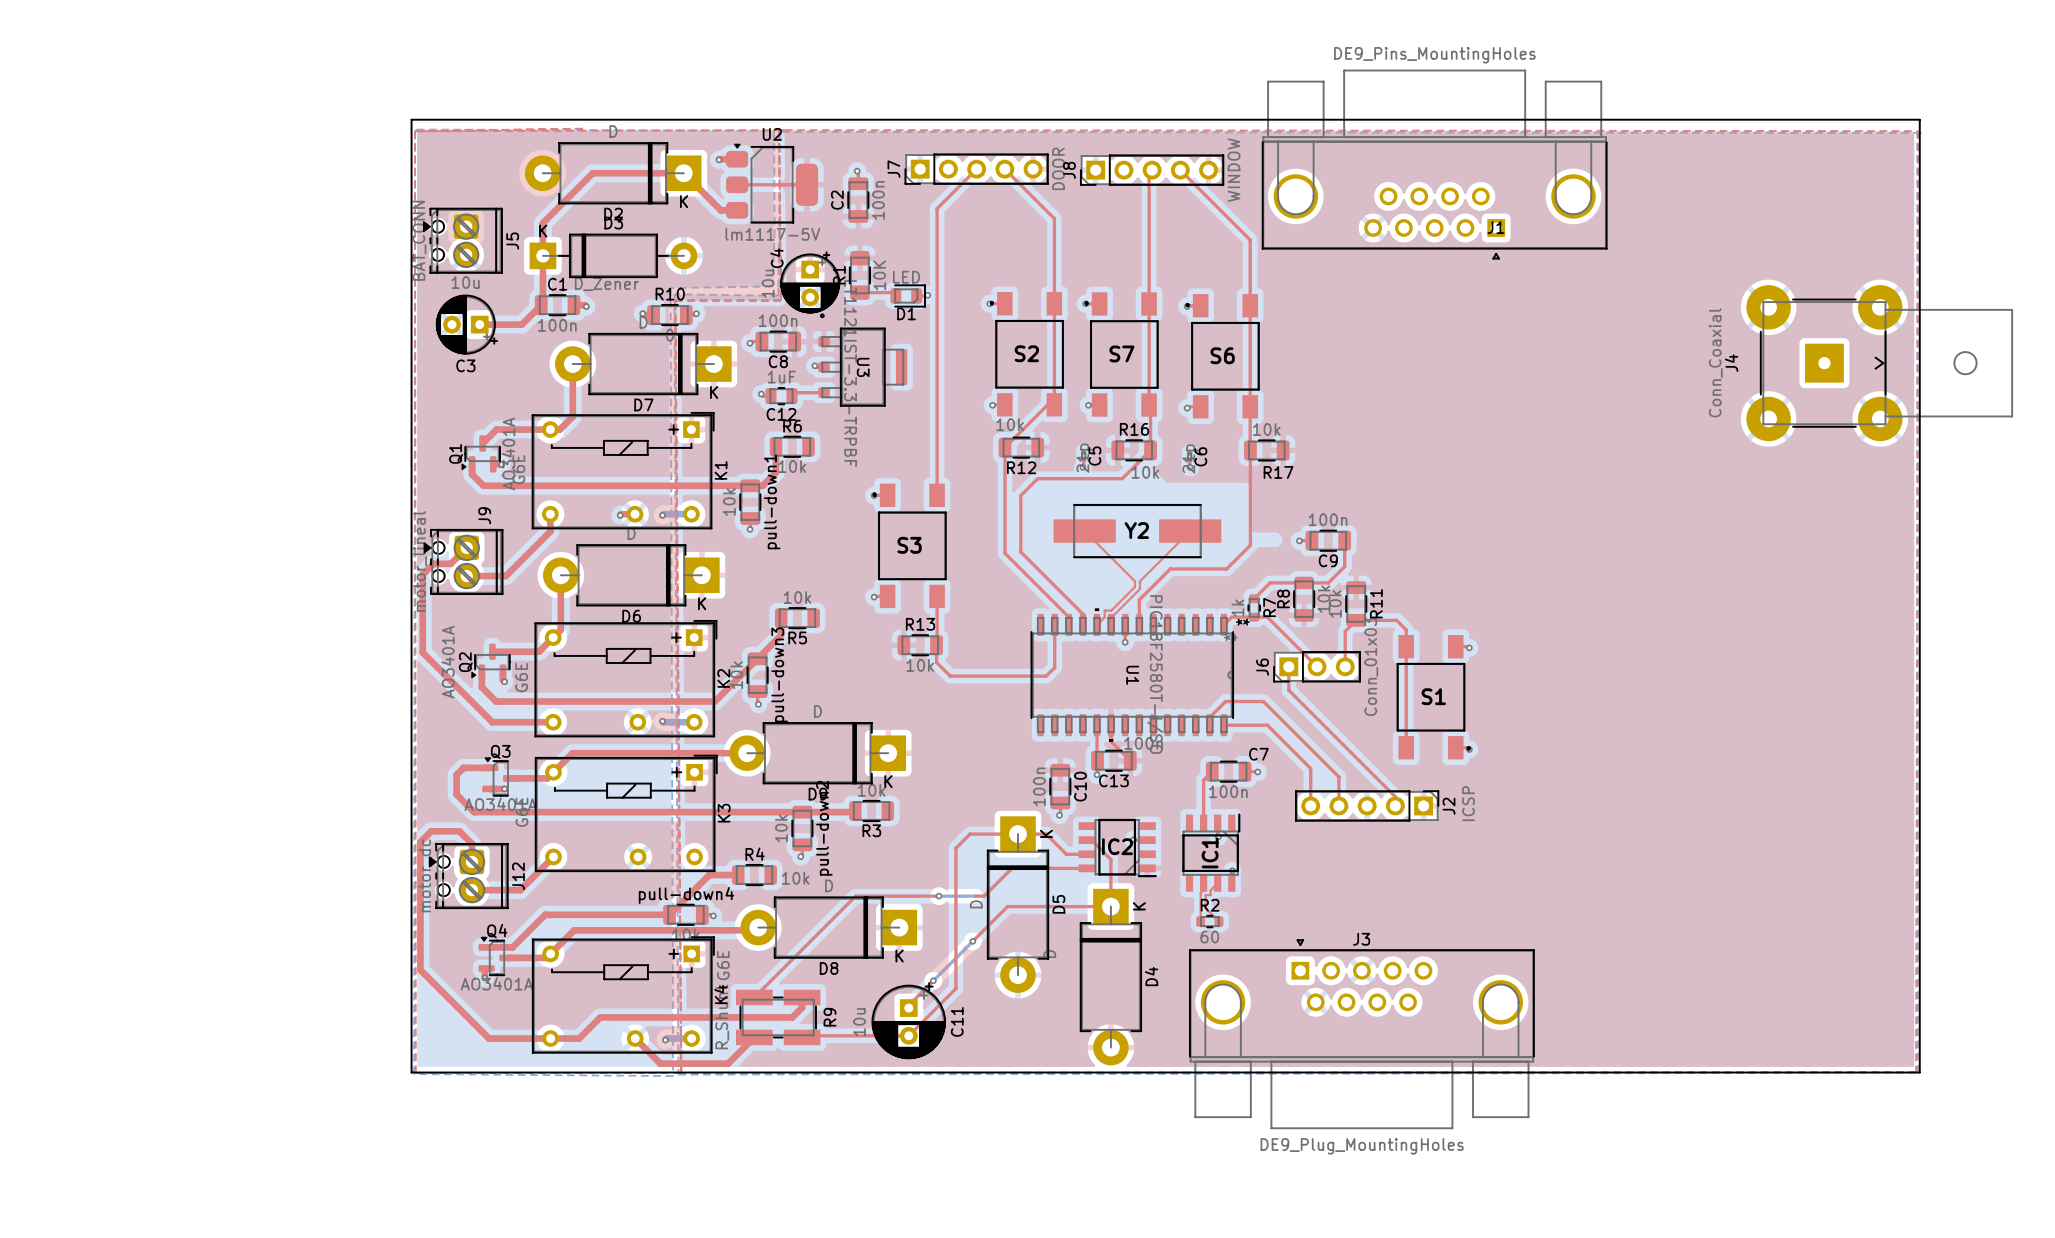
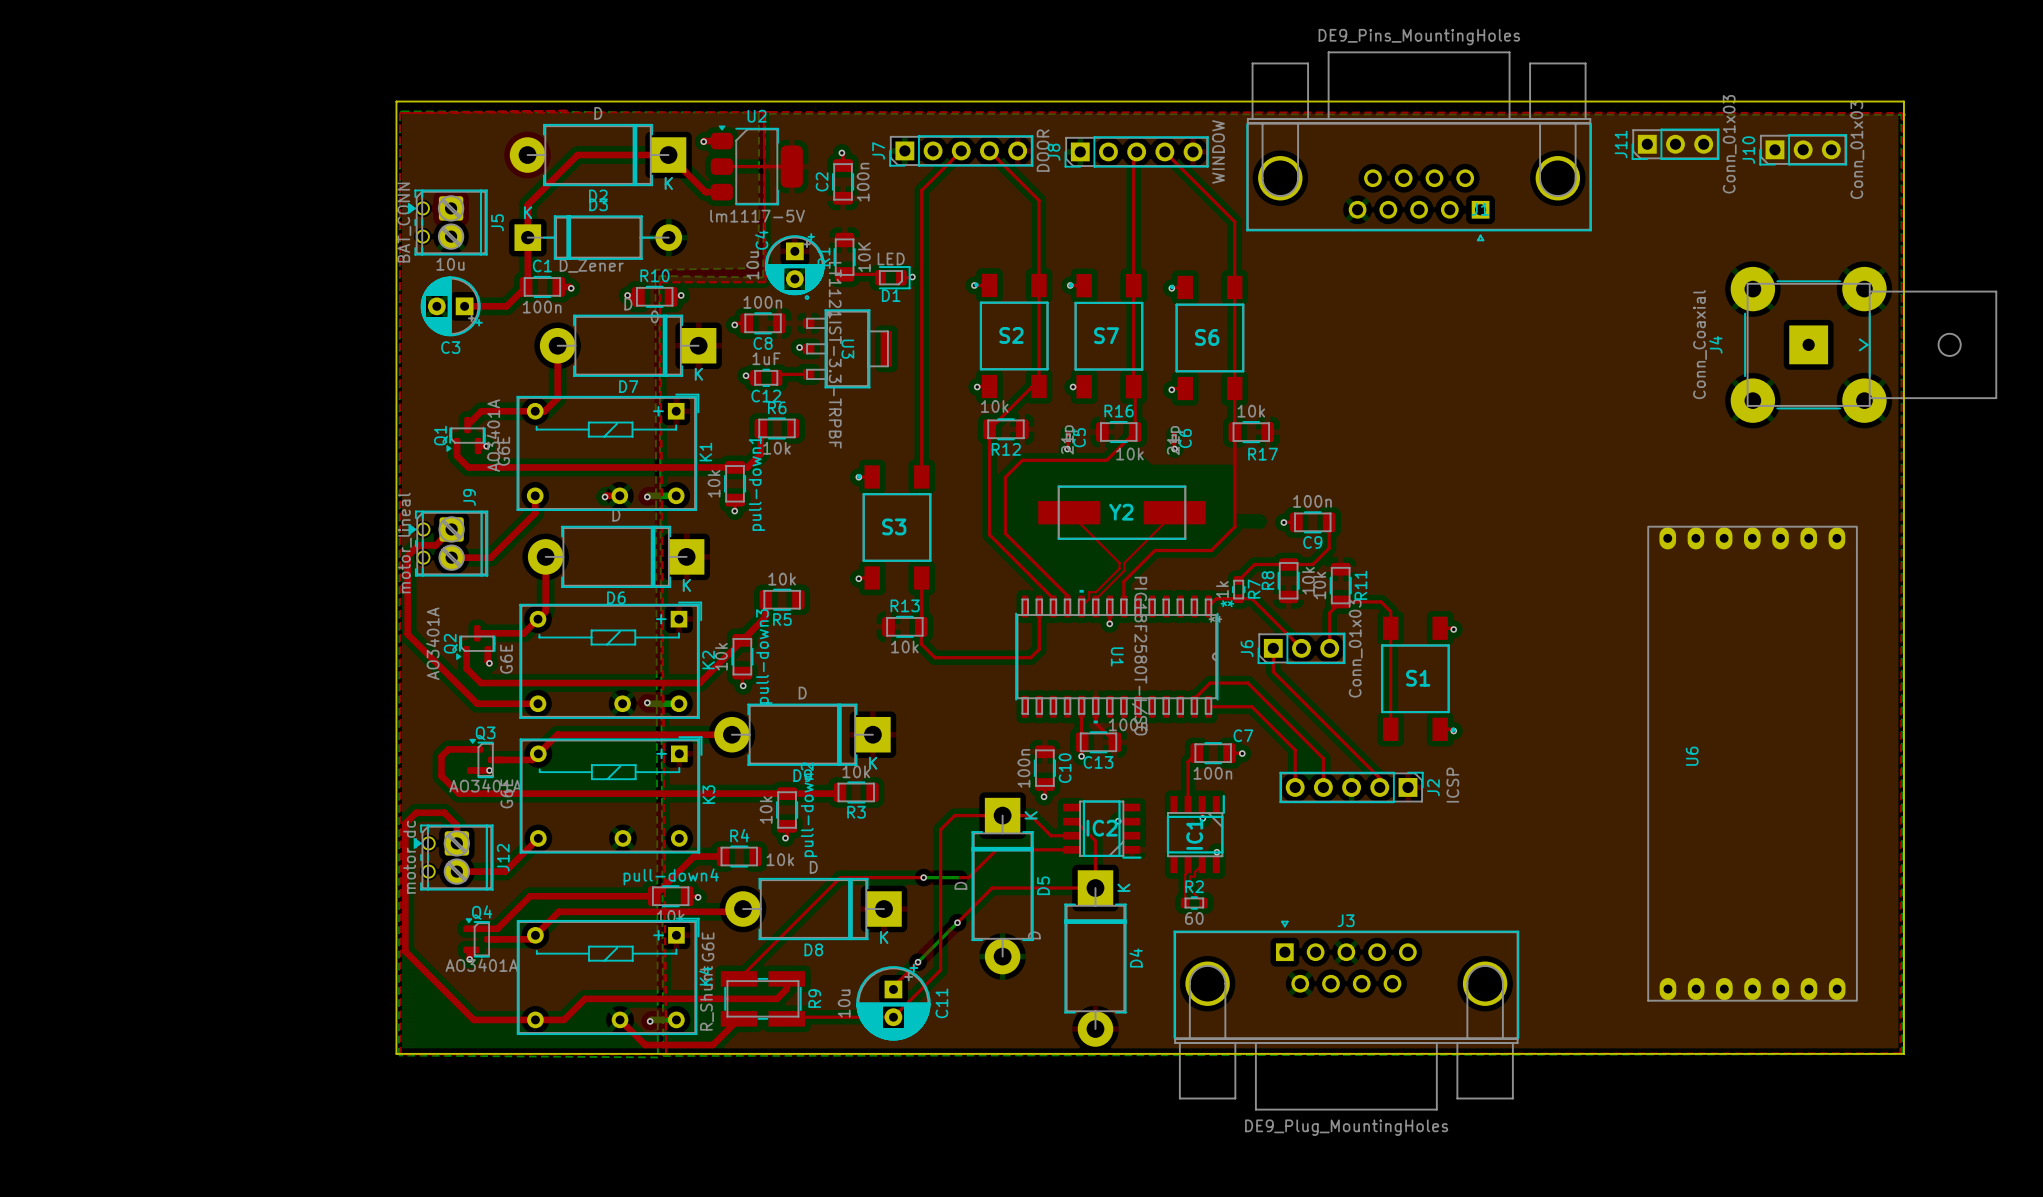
J11: none -> Conn_01x03 (1675, 144)
J10: none -> Conn_01x03 (1803, 149)
U6: none -> (1752, 763)

